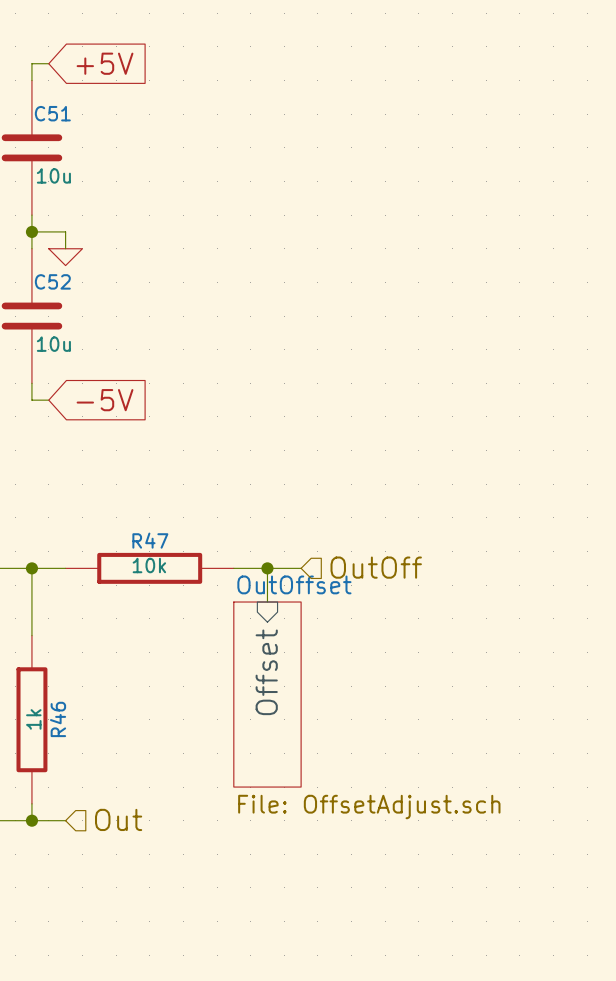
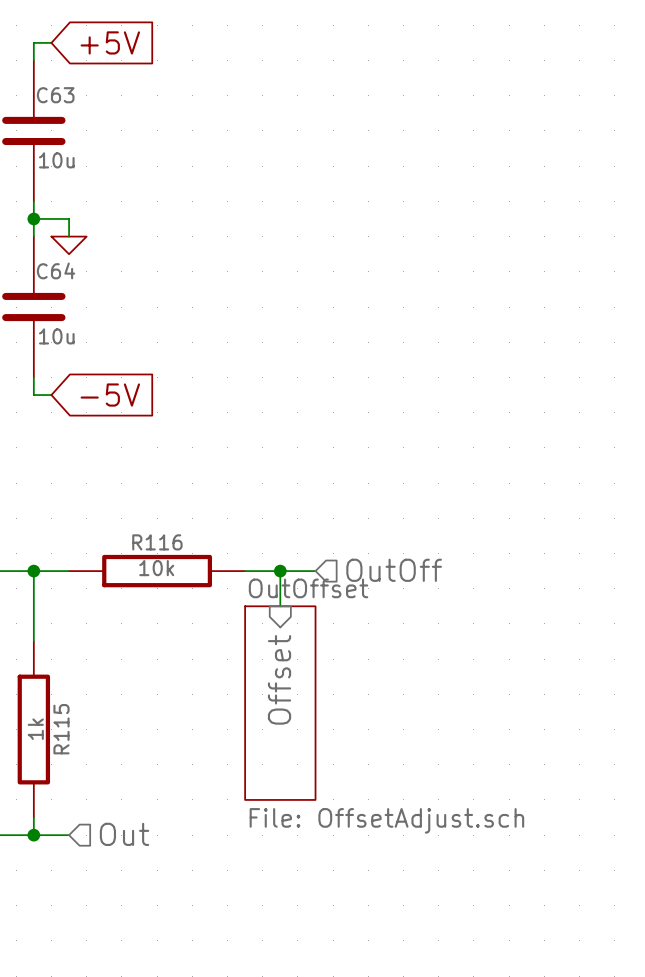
C51 name: C51 (52, 113) -> C63 (55, 95)
C52 name: C52 (52, 281) -> C64 (56, 270)
R47 name: R47 (150, 540) -> R116 (157, 542)
R46 name: R46 (58, 719) -> R115 (61, 729)

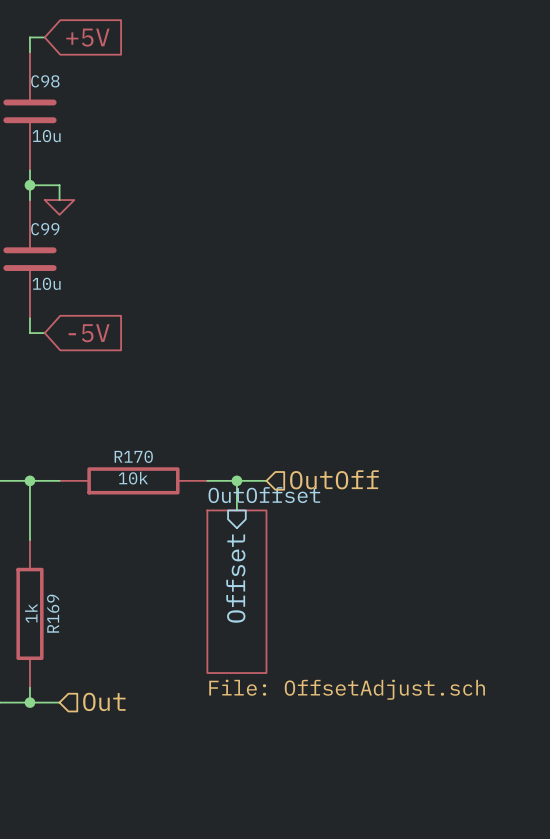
C63 name: C63 (55, 95) -> C98 (45, 81)
C64 name: C64 (56, 270) -> C99 (45, 229)
R116 name: R116 (157, 542) -> R170 (133, 456)
R115 name: R115 (61, 729) -> R169 (53, 613)

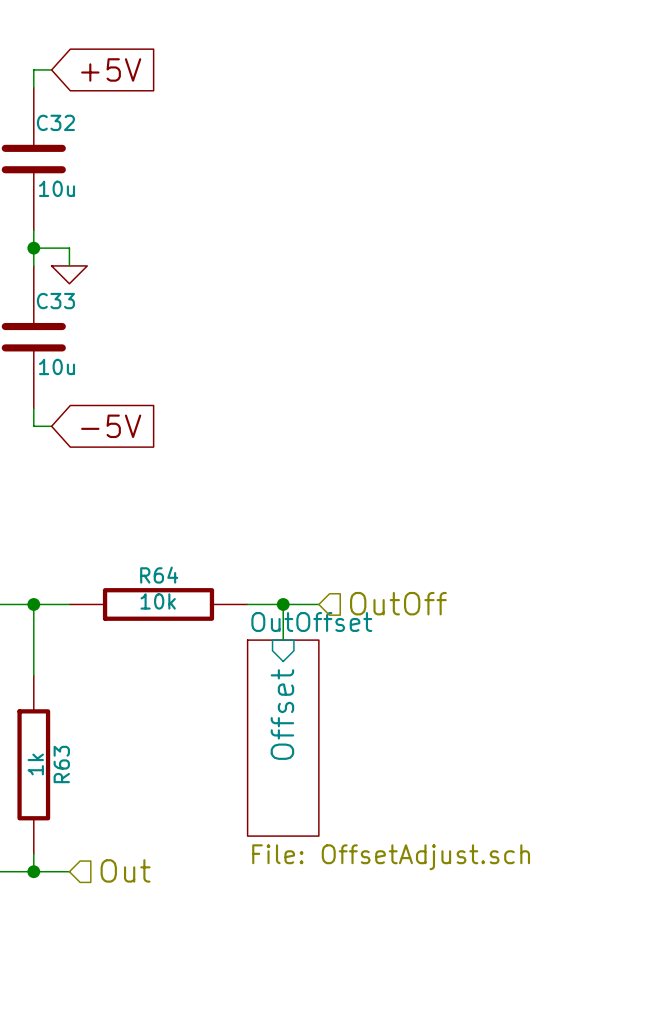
C98 name: C98 (45, 81) -> C32 (55, 122)
C99 name: C99 (45, 229) -> C33 (55, 301)
R170 name: R170 (133, 456) -> R64 (159, 575)
R169 name: R169 (53, 613) -> R63 (61, 764)

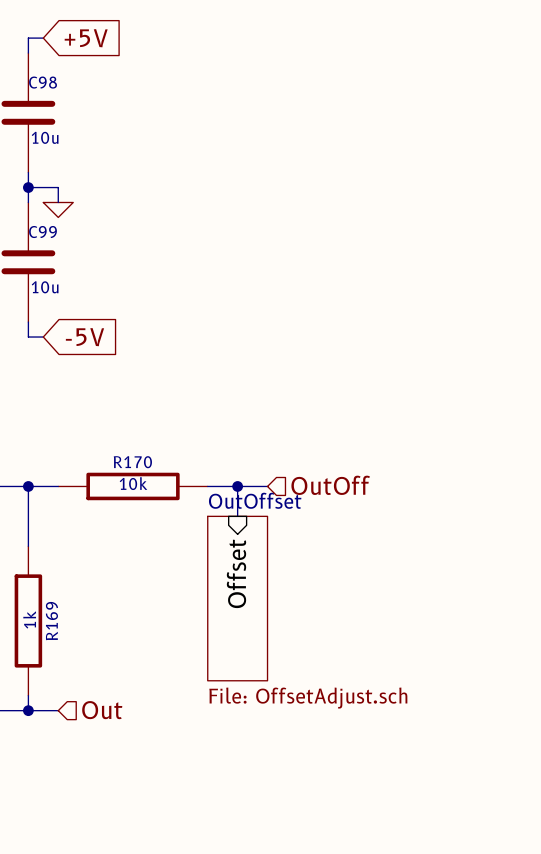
C32 name: C32 (55, 122) -> C98 (43, 82)
C33 name: C33 (55, 301) -> C99 (42, 232)
R64 name: R64 (159, 575) -> R170 (132, 462)
R63 name: R63 (61, 764) -> R169 (51, 621)

